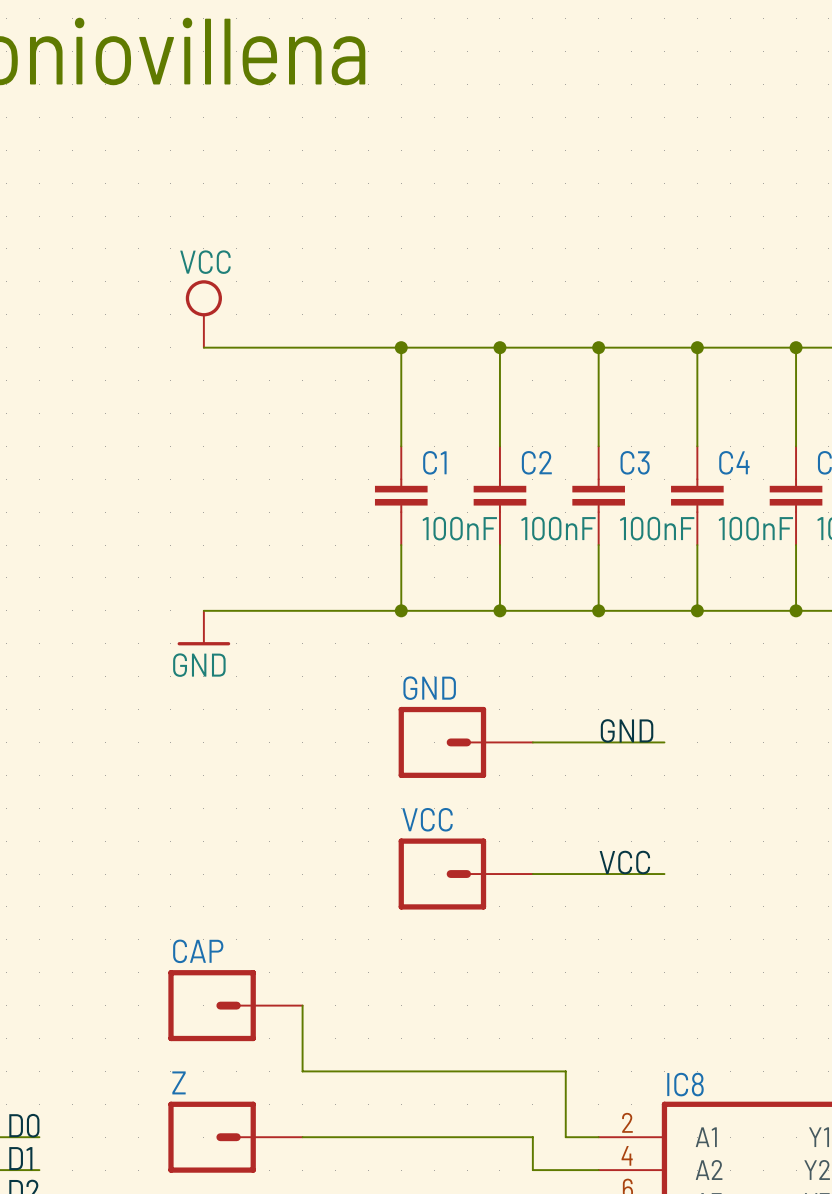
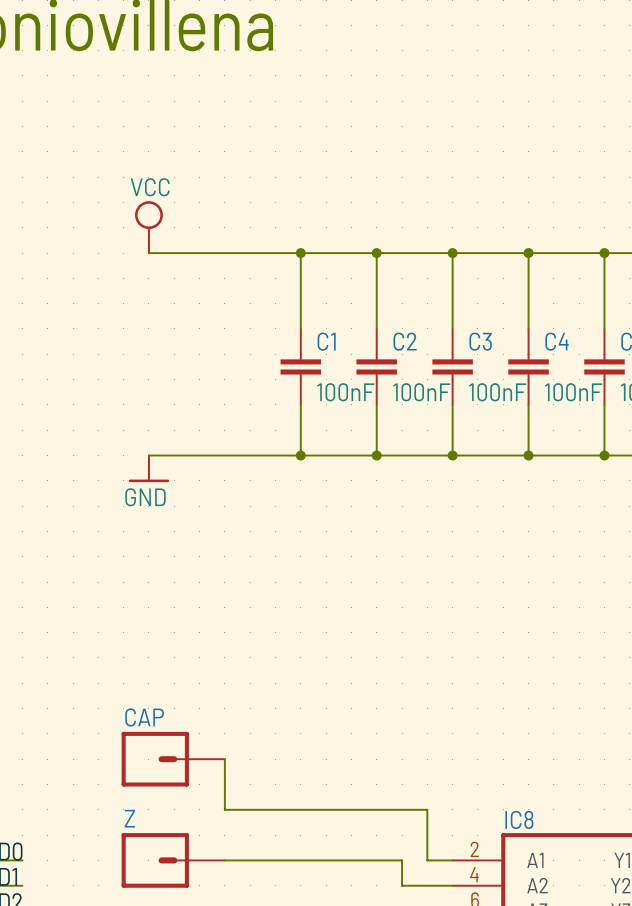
label: GND (627, 730) -> none
GND: (465, 742) -> none
wire: (532, 742) (664, 742) -> none
label: VCC (624, 862) -> none
VCC: (465, 874) -> none
wire: (532, 874) (664, 874) -> none

